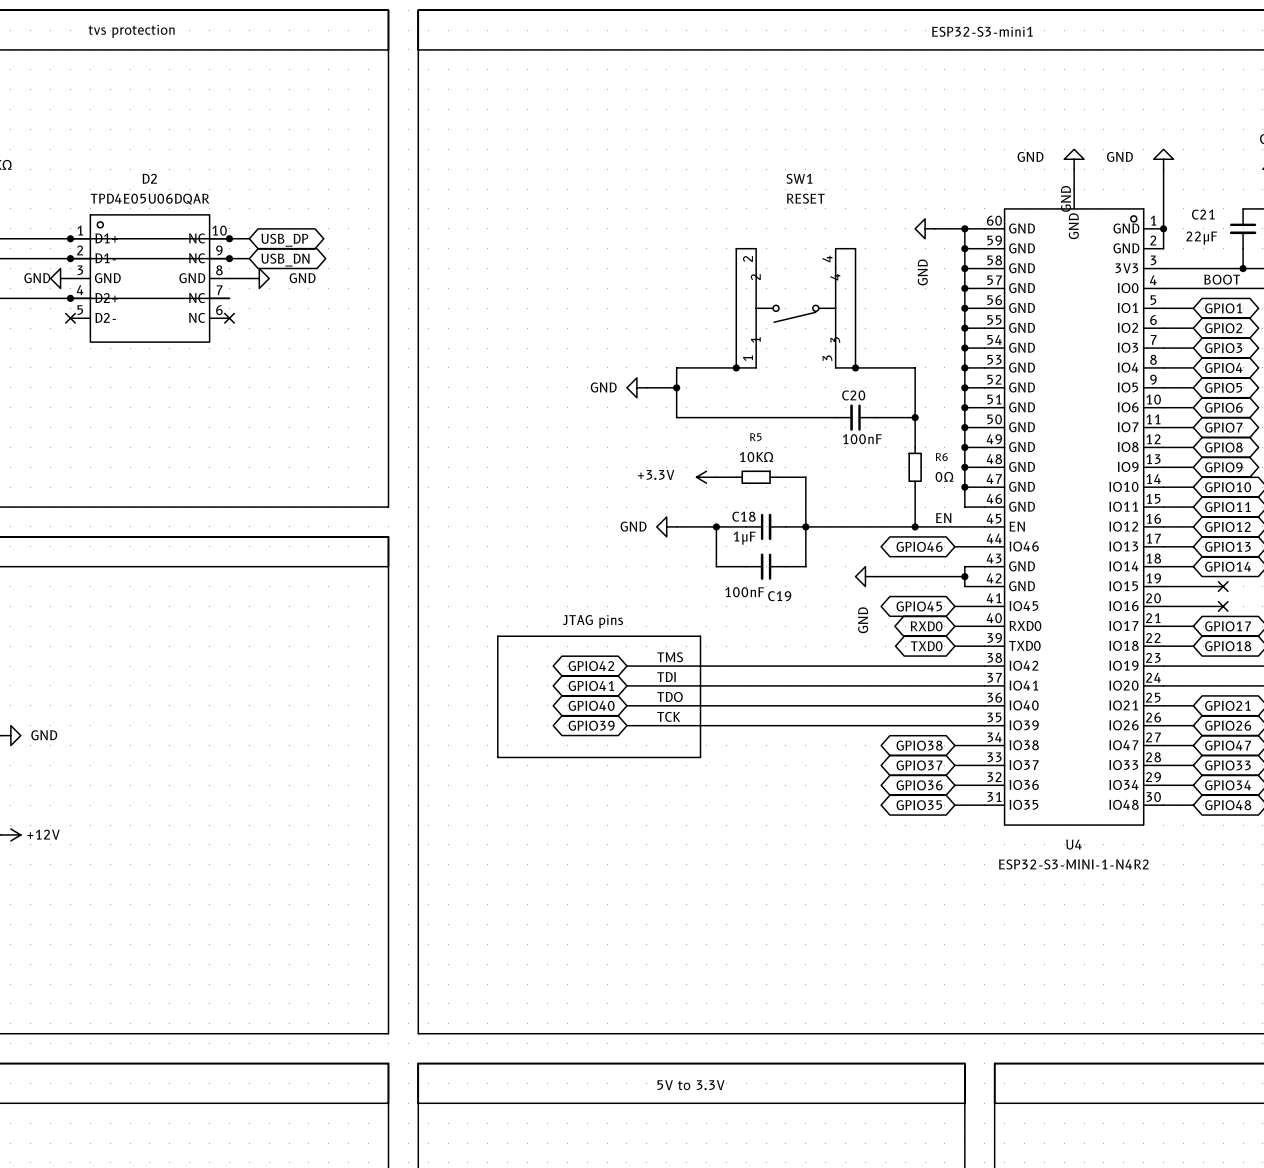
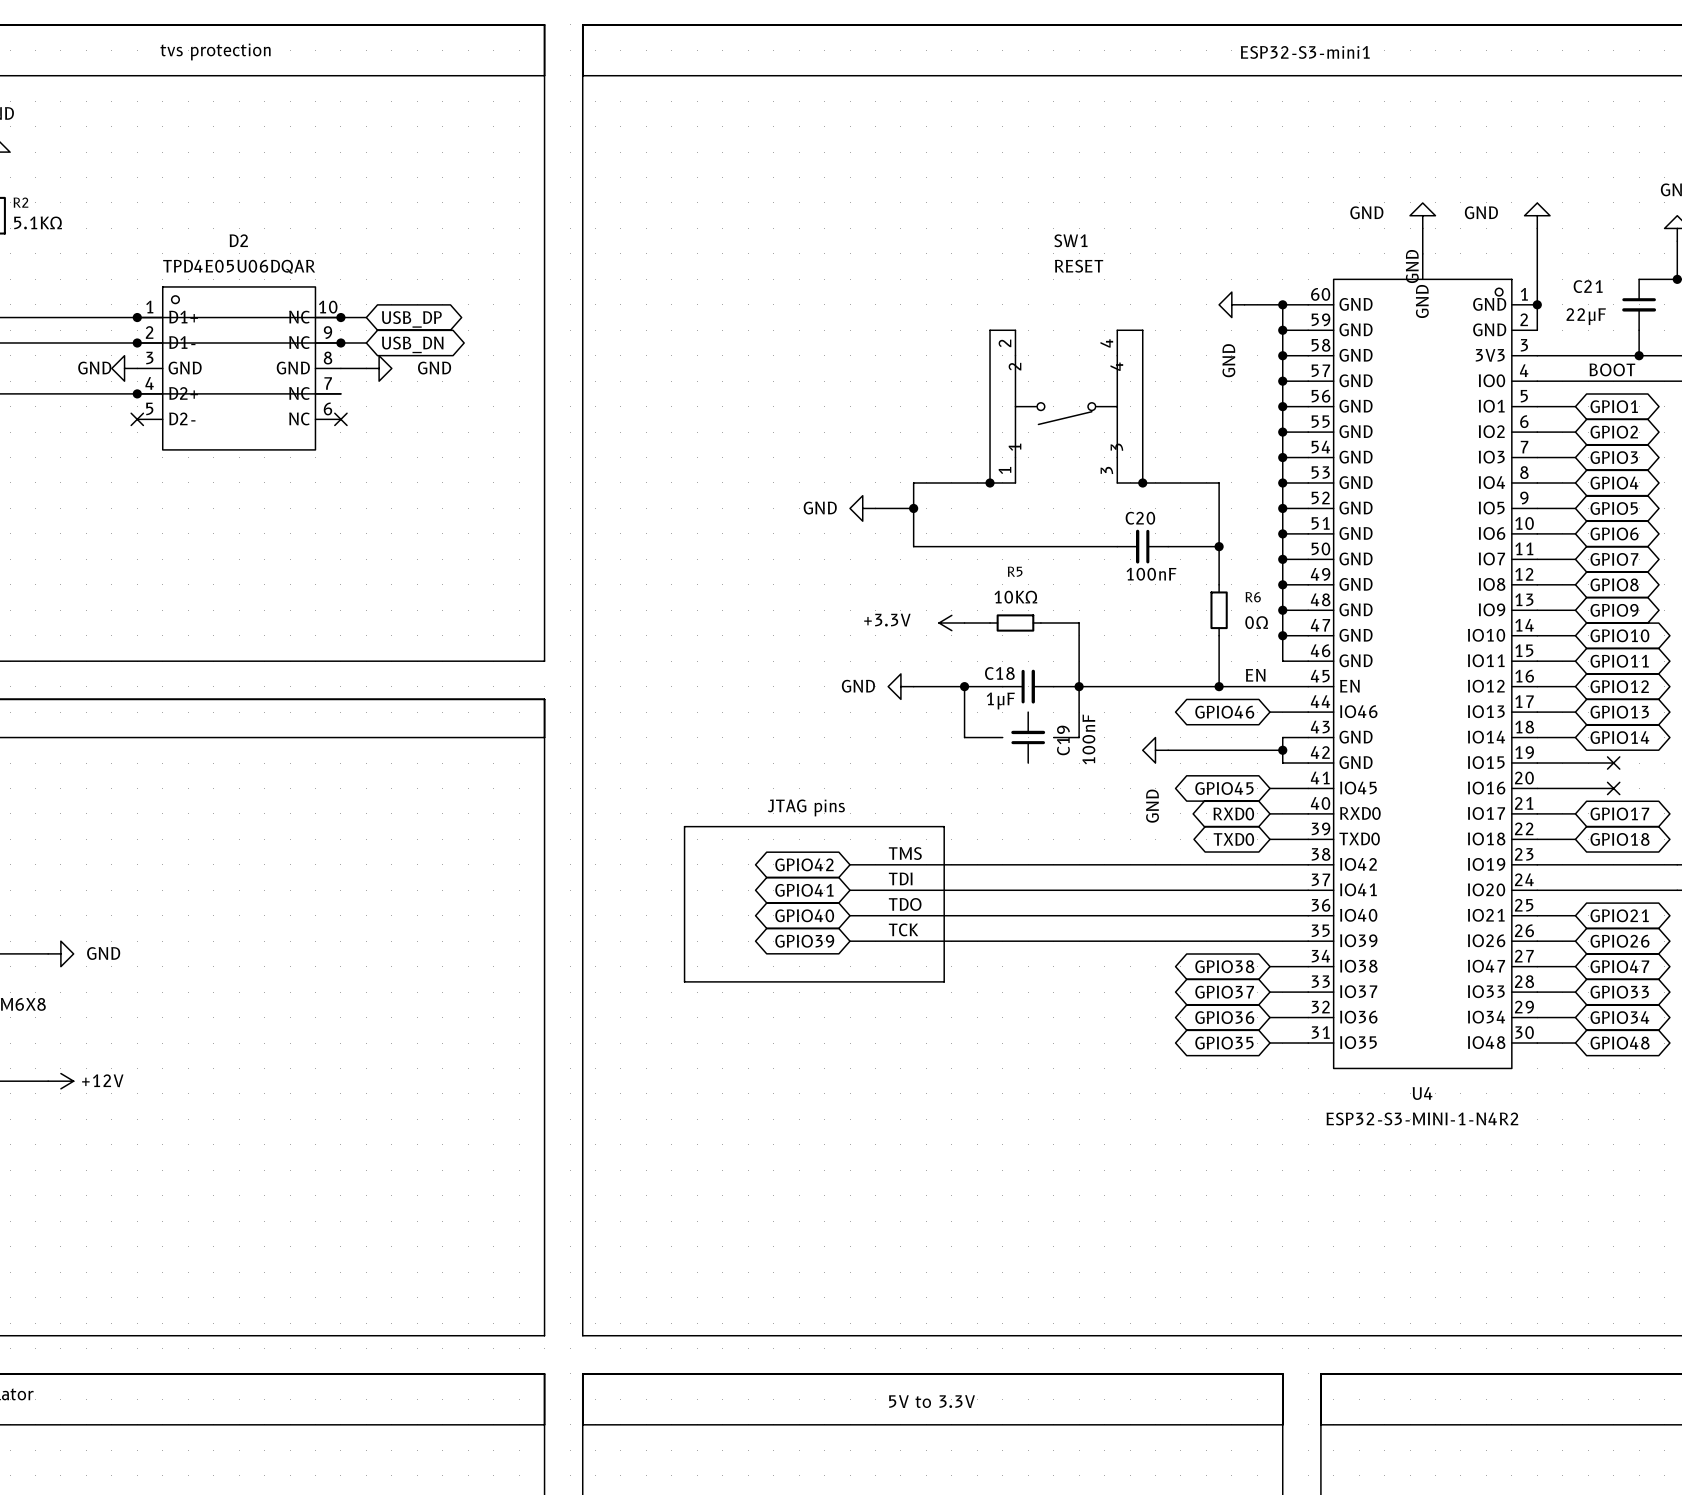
C19 rotation: 0° (766, 566) -> 90° clockwise (1028, 737)
C19 value position: 100nF (744, 592) -> 100nF (1088, 739)
C19 name position: C19 (779, 596) -> C19 (1063, 740)

